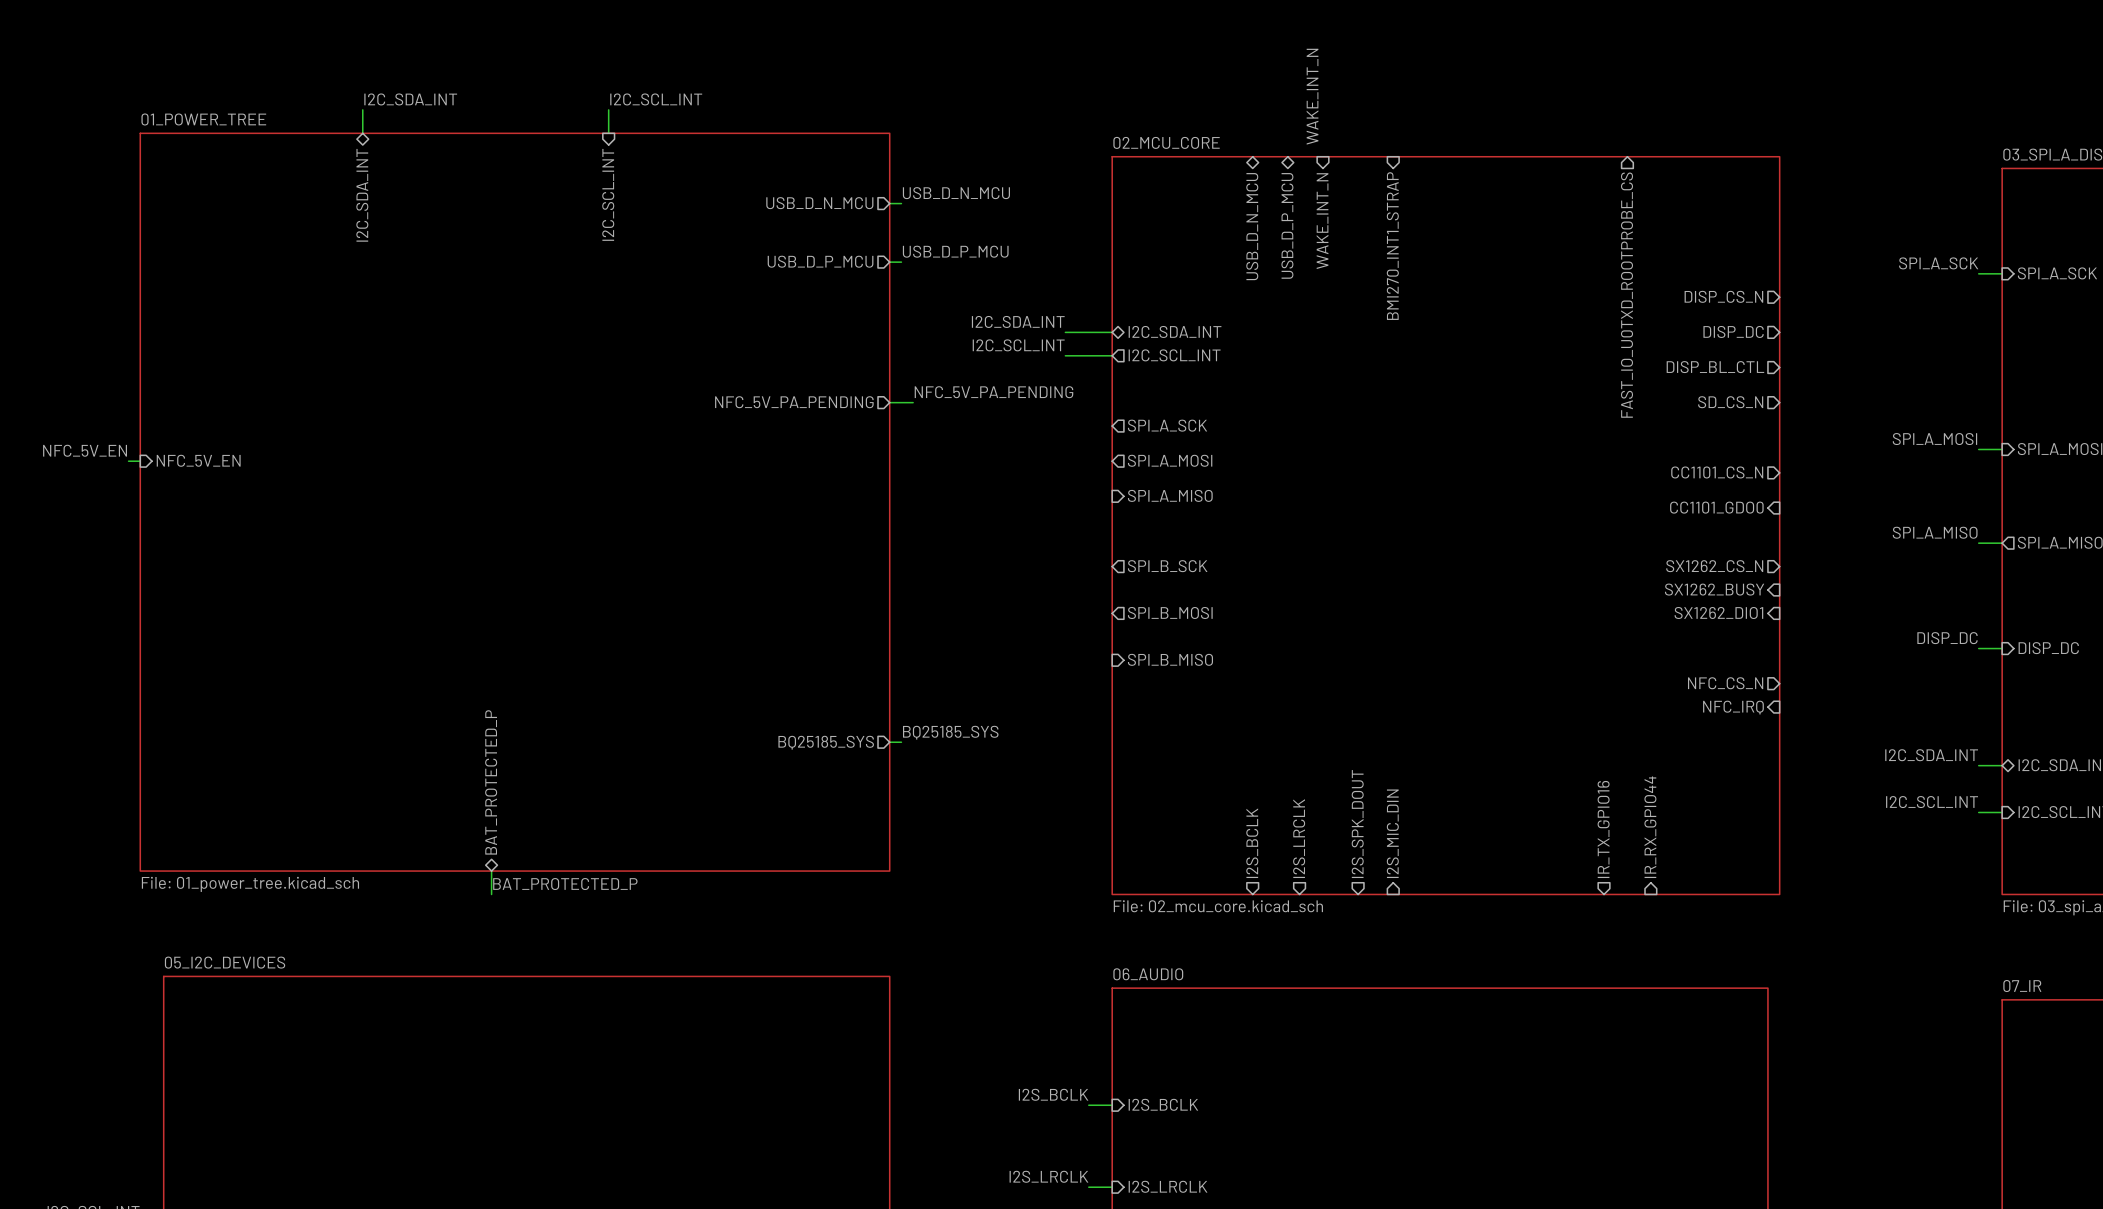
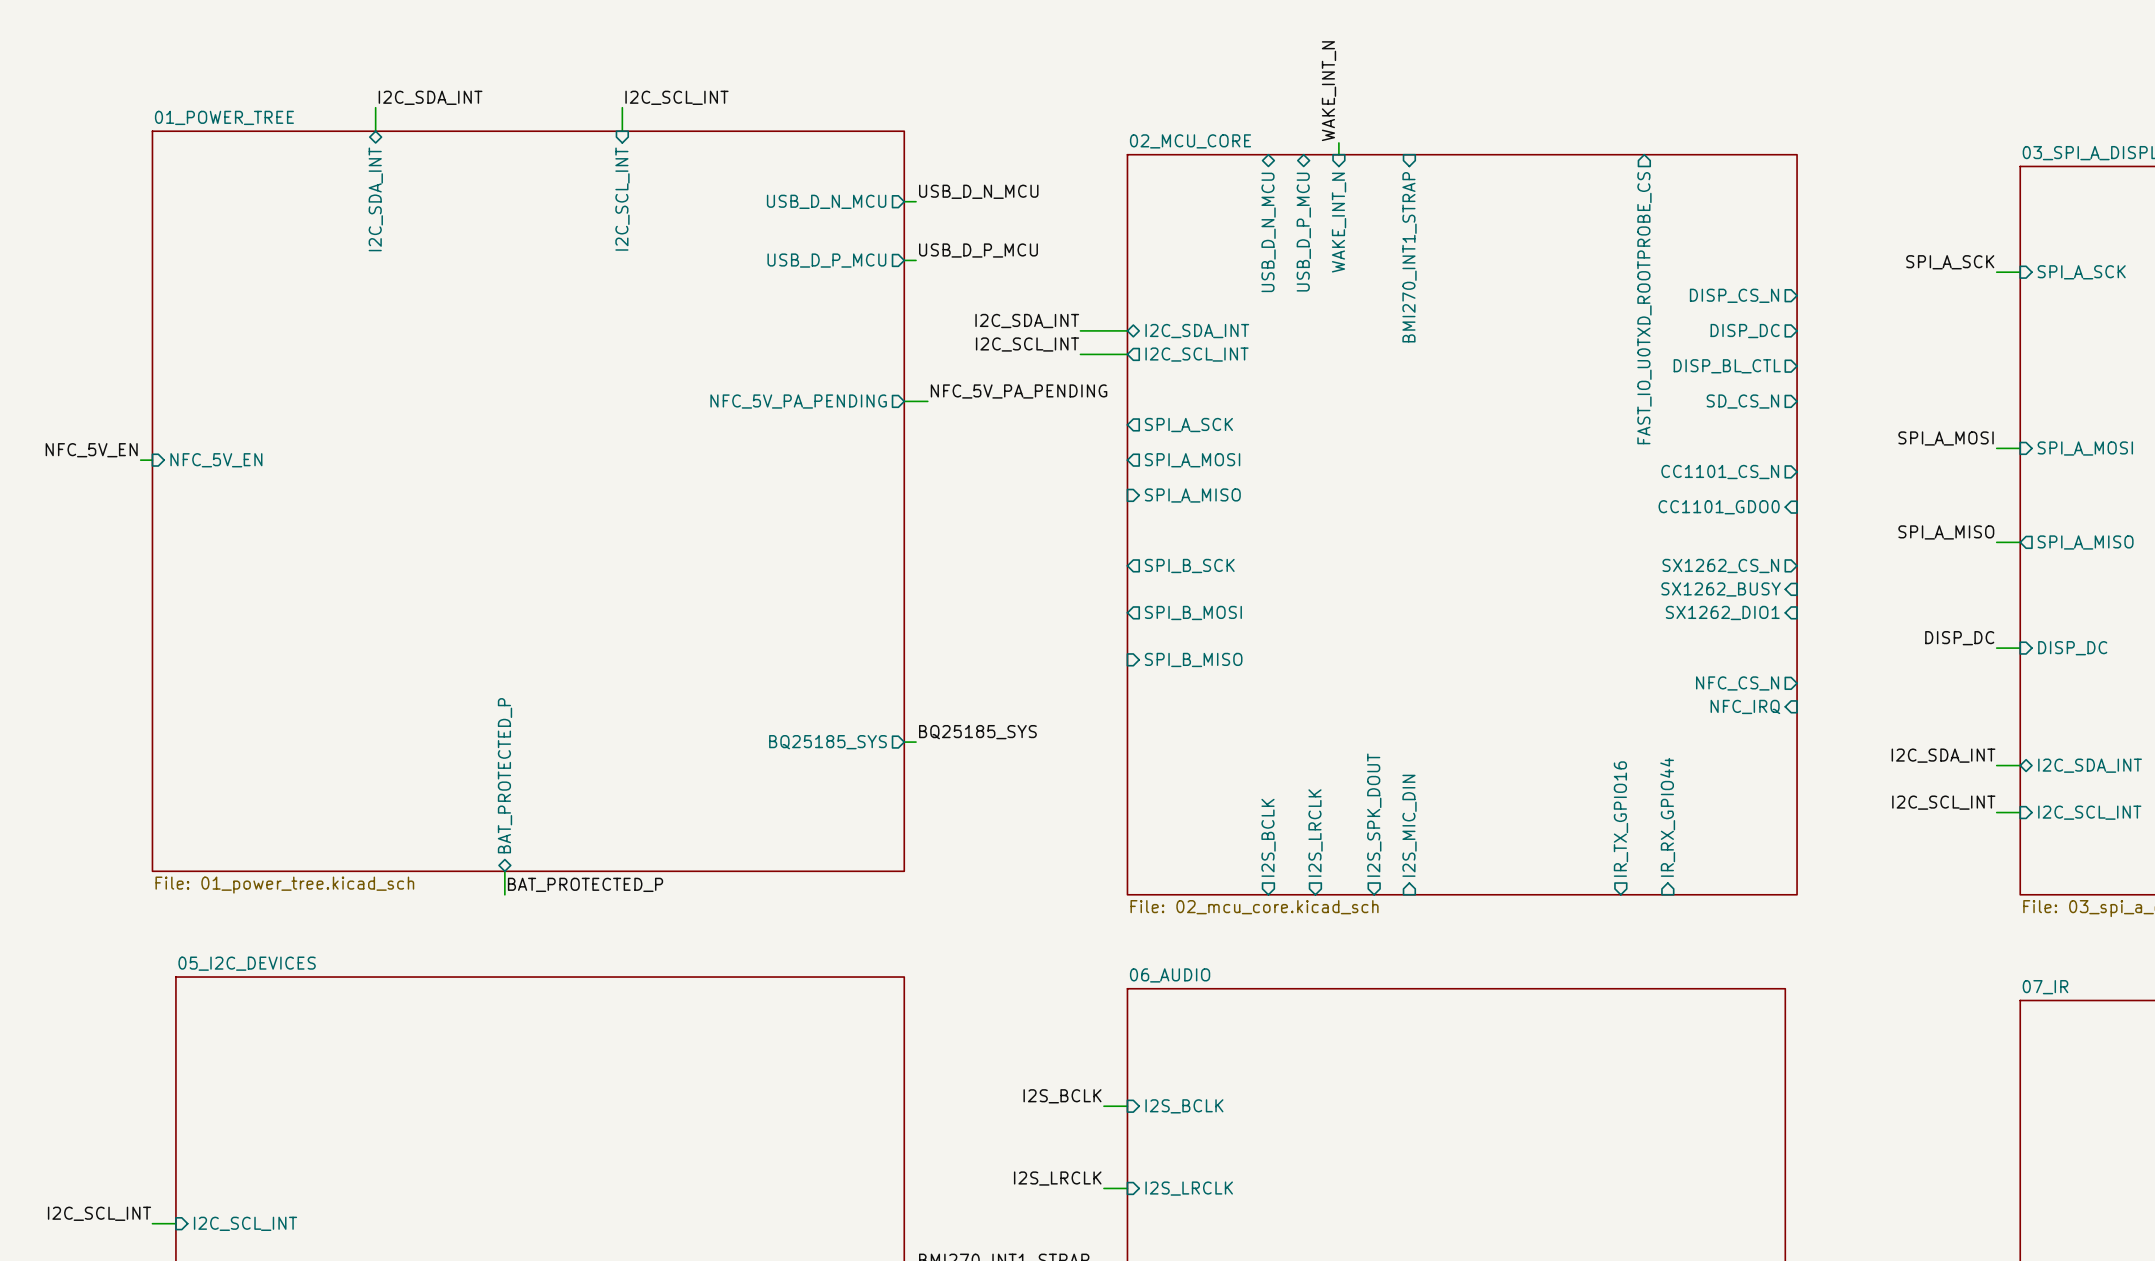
wire: none -> (1338, 142) (1338, 154)

